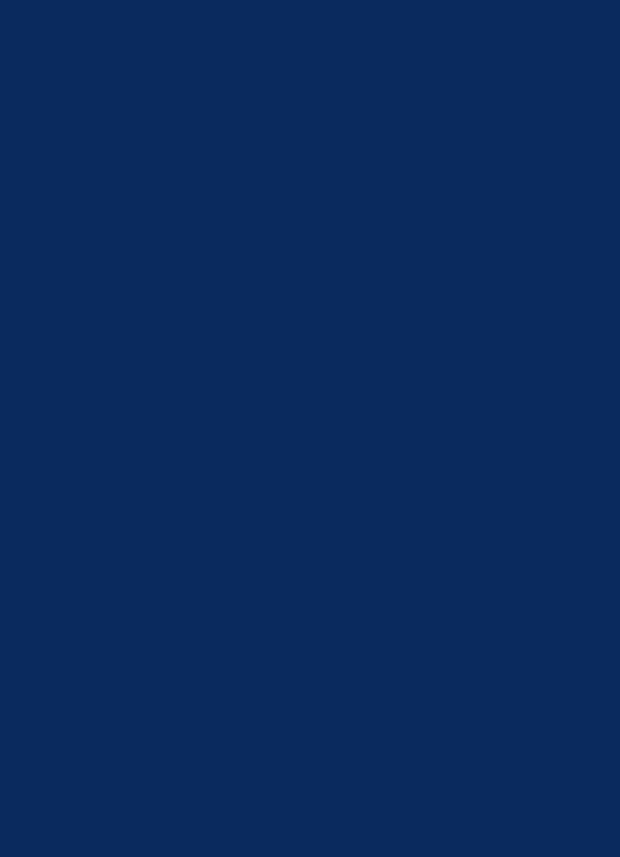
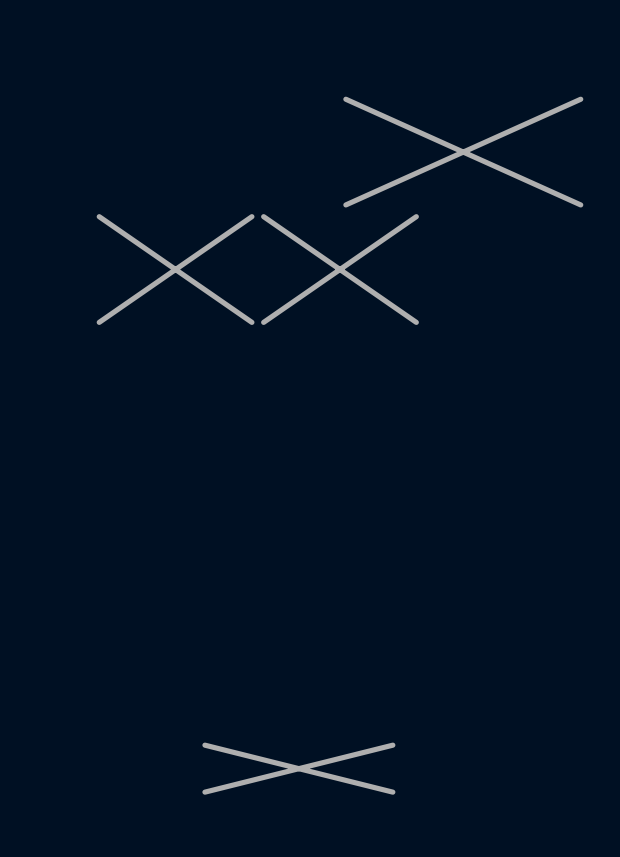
line: none -> (345, 99) (580, 204)
line: none -> (580, 99) (345, 204)
line: none -> (99, 216) (251, 322)
line: none -> (251, 216) (99, 322)
line: none -> (263, 216) (416, 322)
line: none -> (416, 216) (263, 322)
line: none -> (204, 745) (392, 792)
line: none -> (392, 745) (204, 792)

